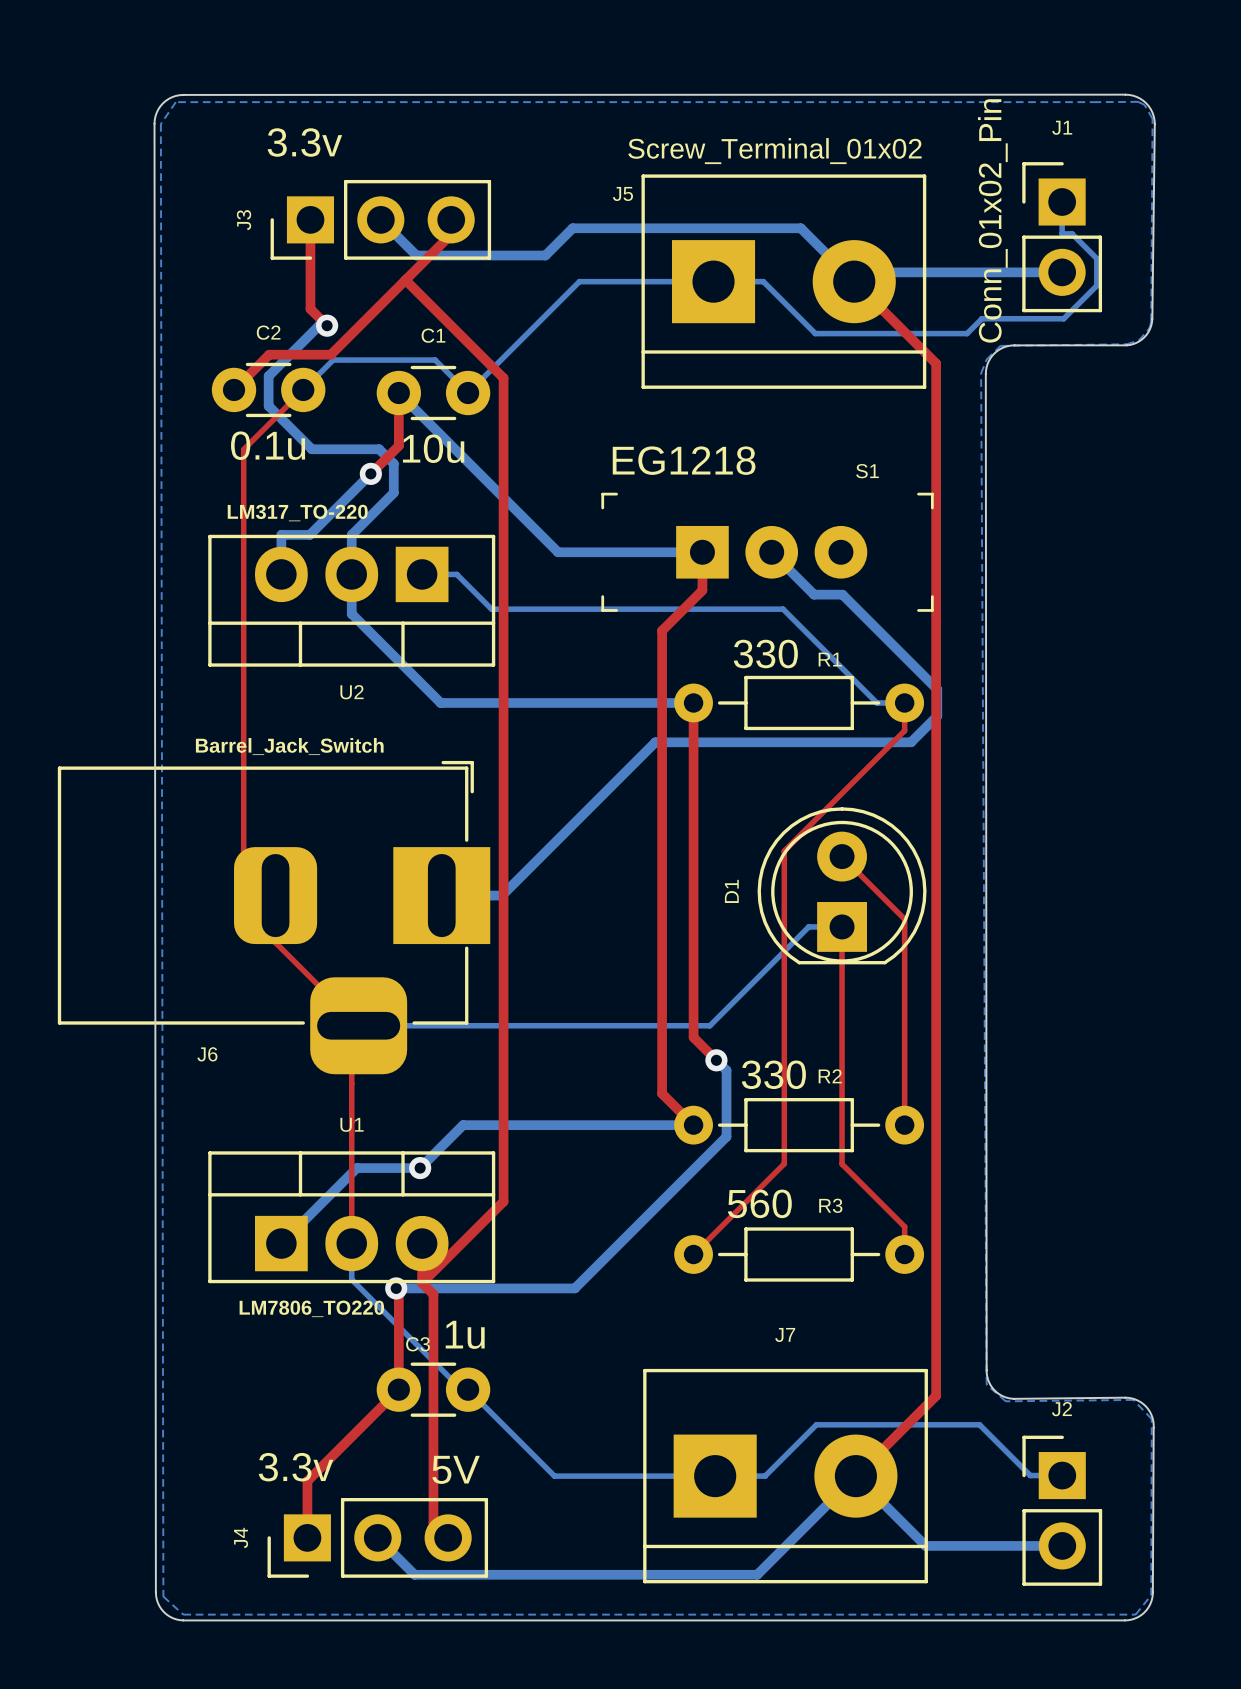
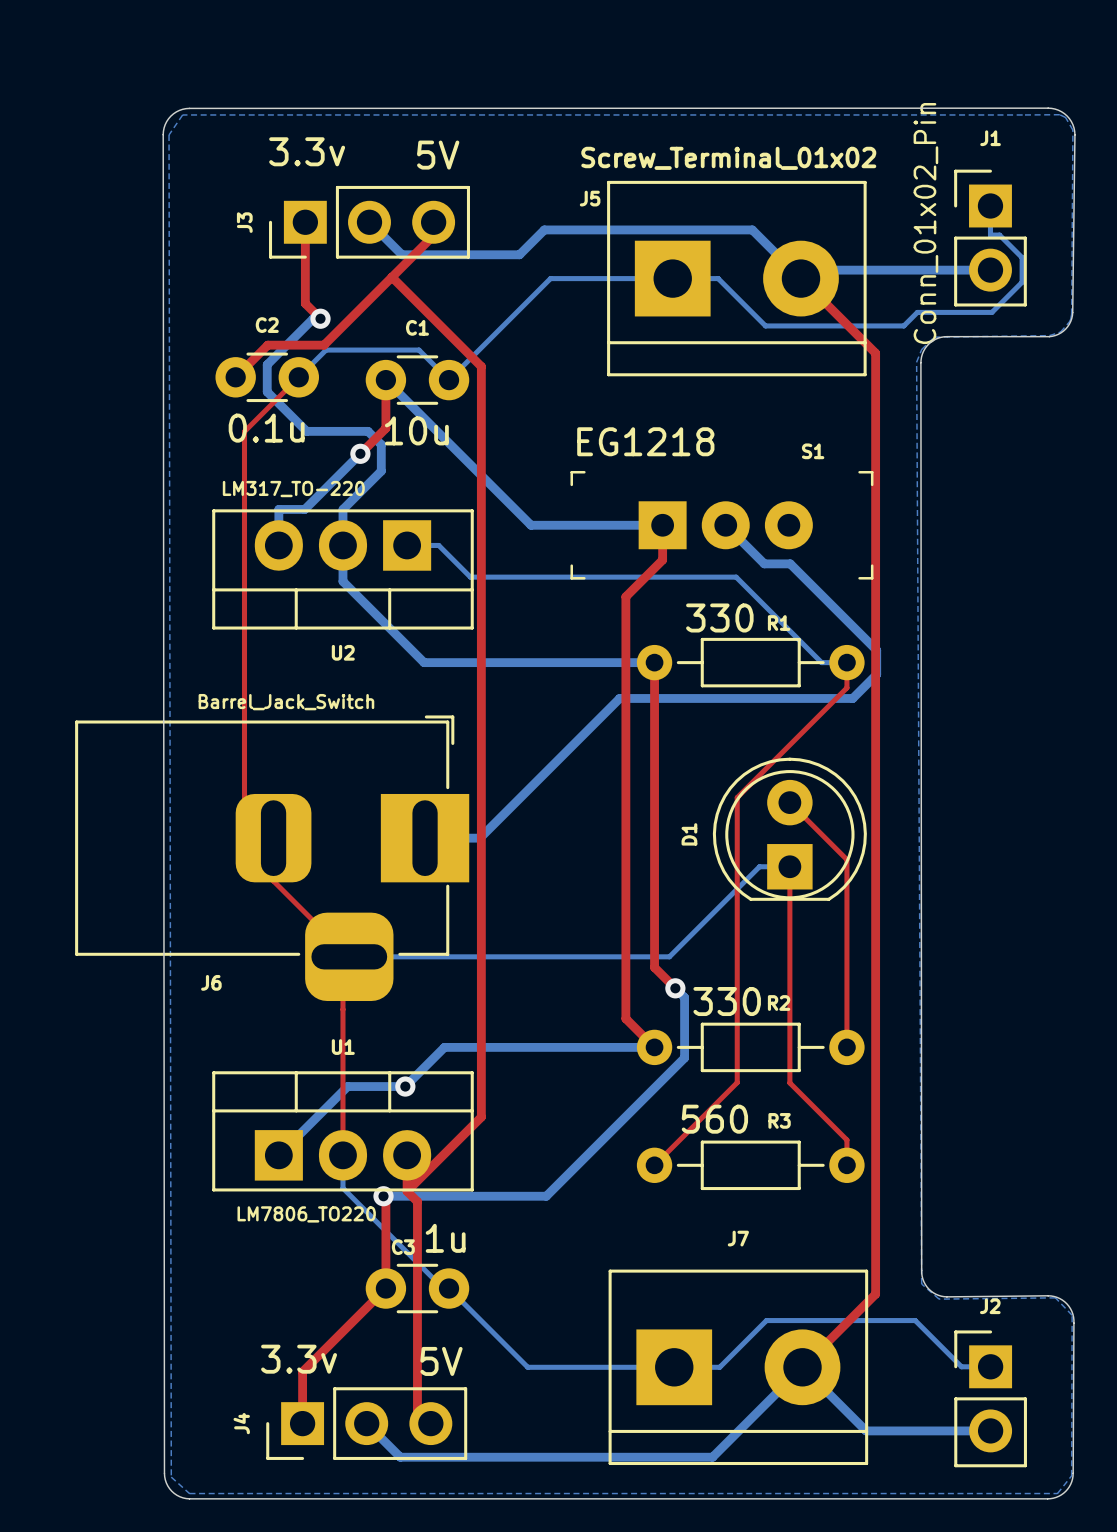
text: none -> 5V (438, 155)

